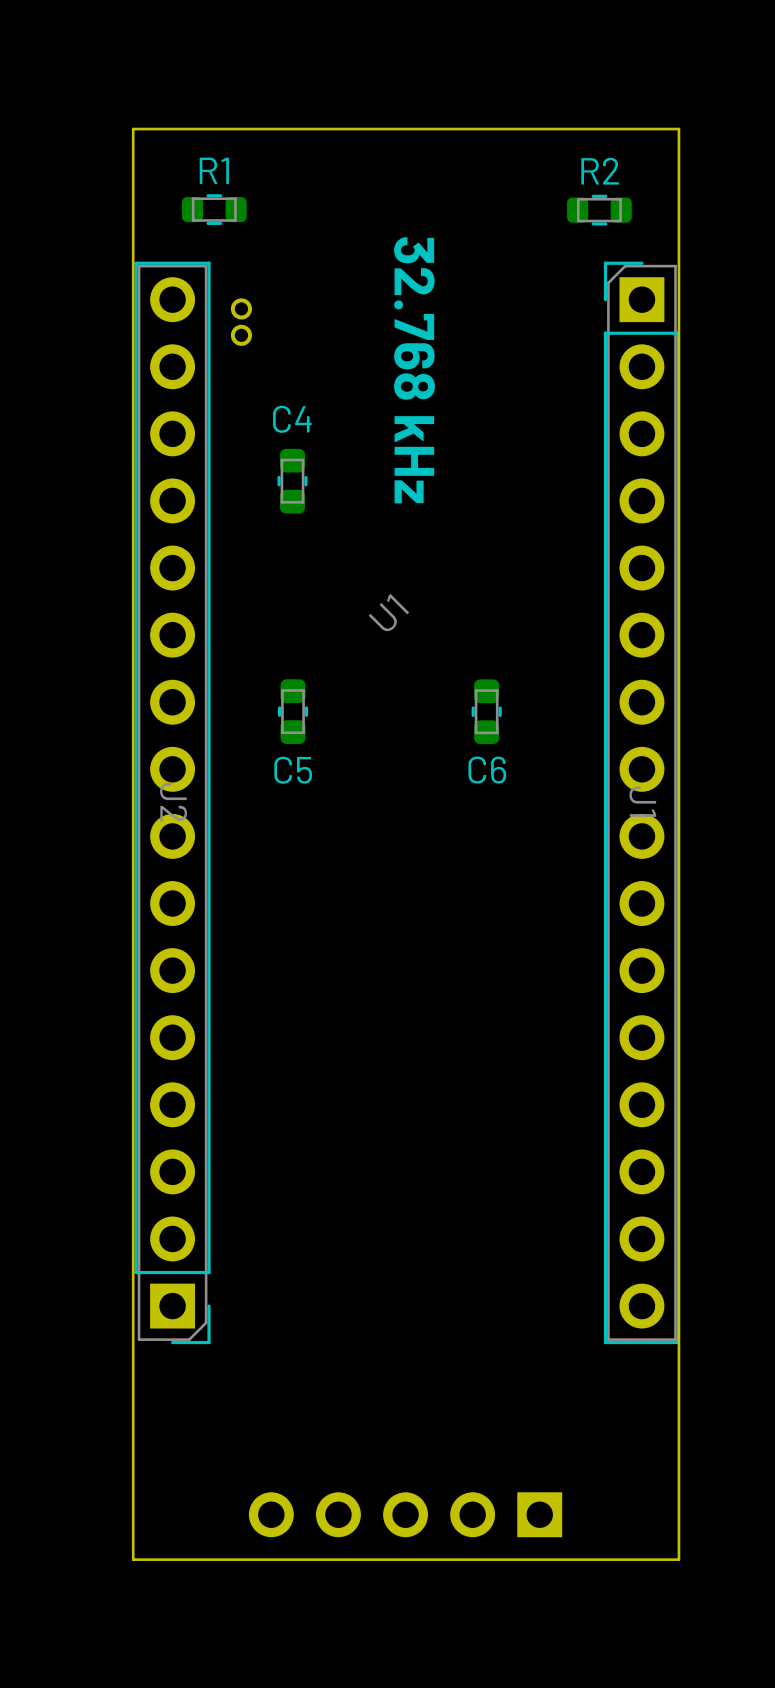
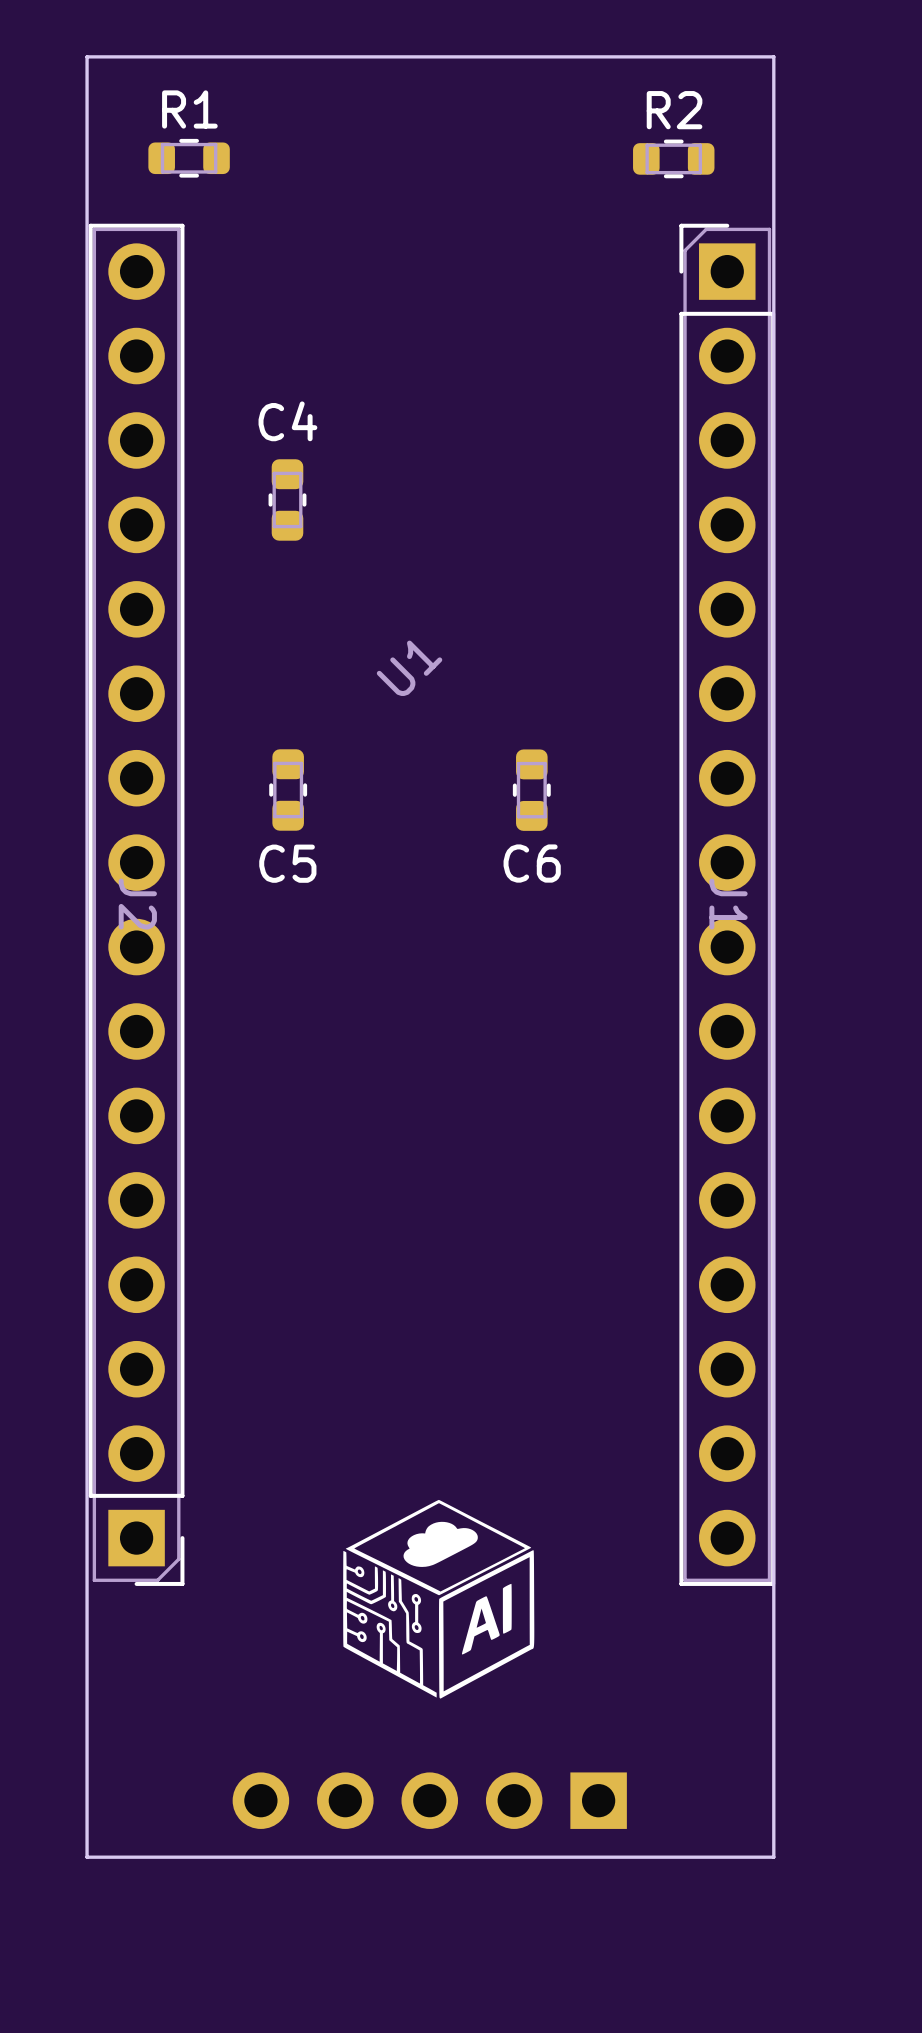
part: (241, 322) -> none
text: 32.768 kHz (414, 370) -> none
drawing: none -> [343, 1499, 535, 1699]

